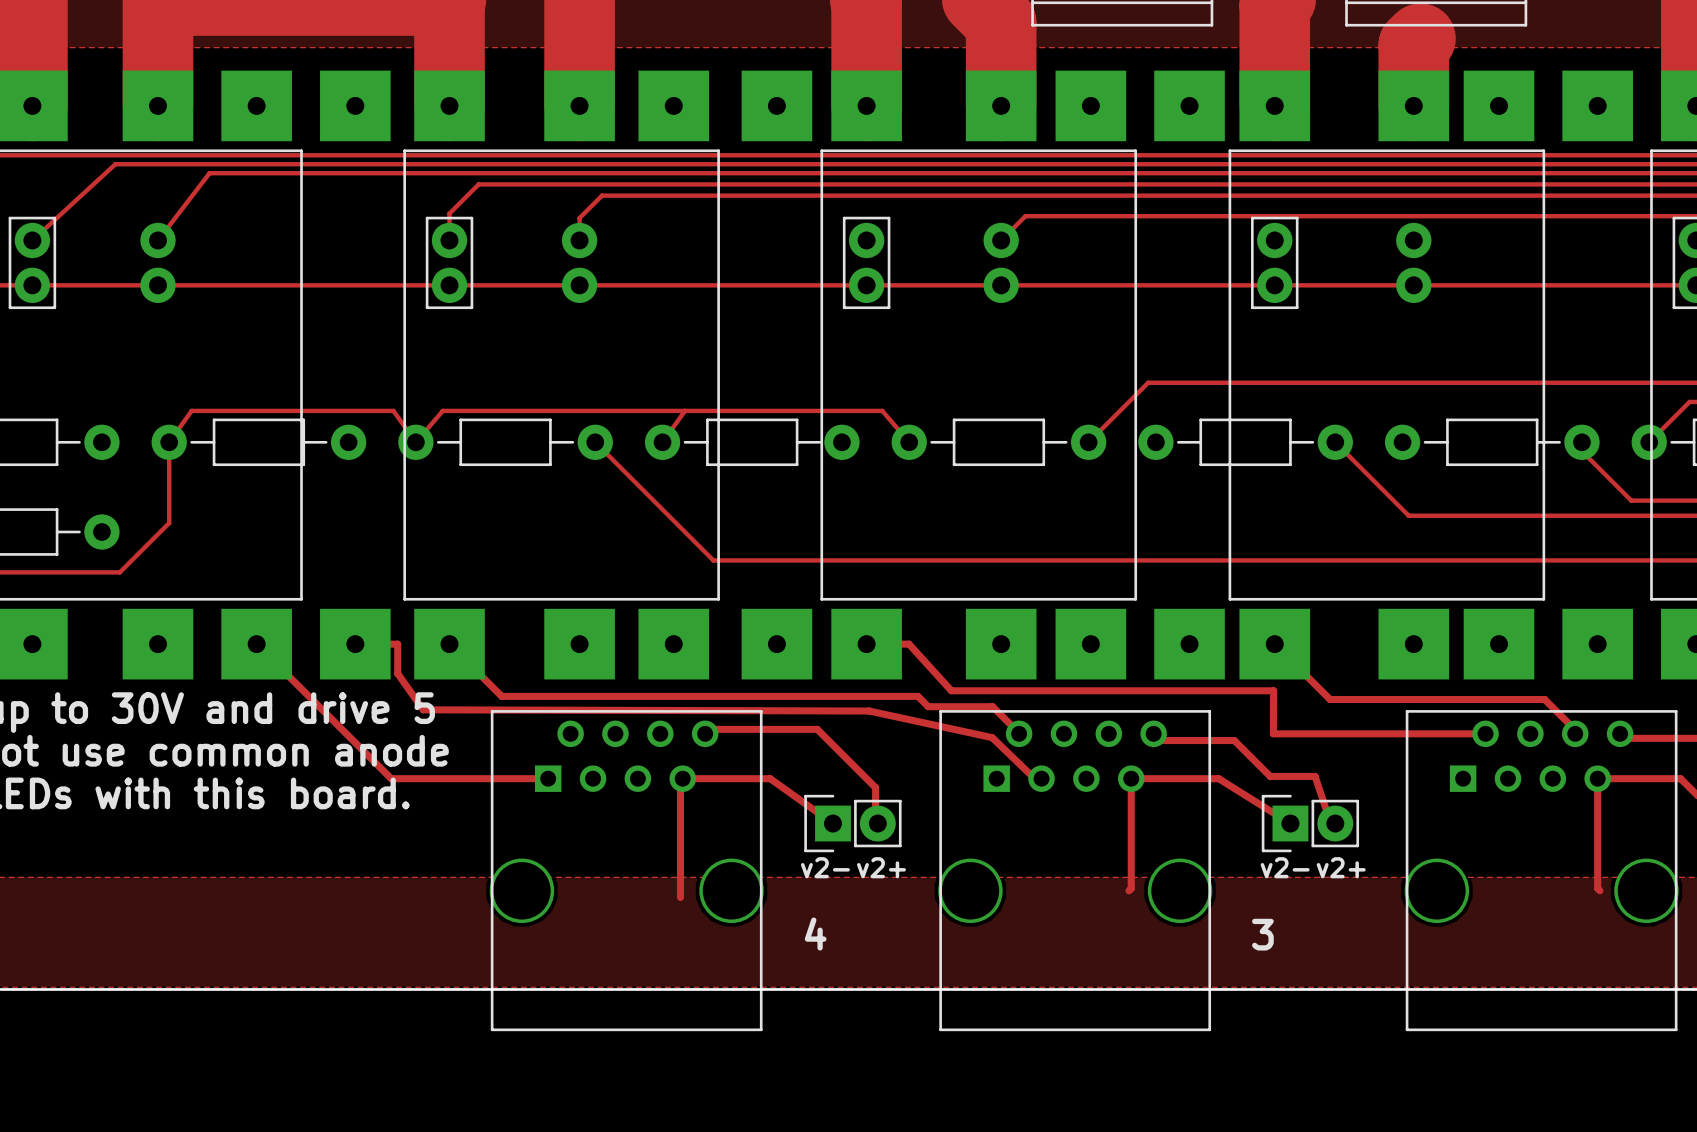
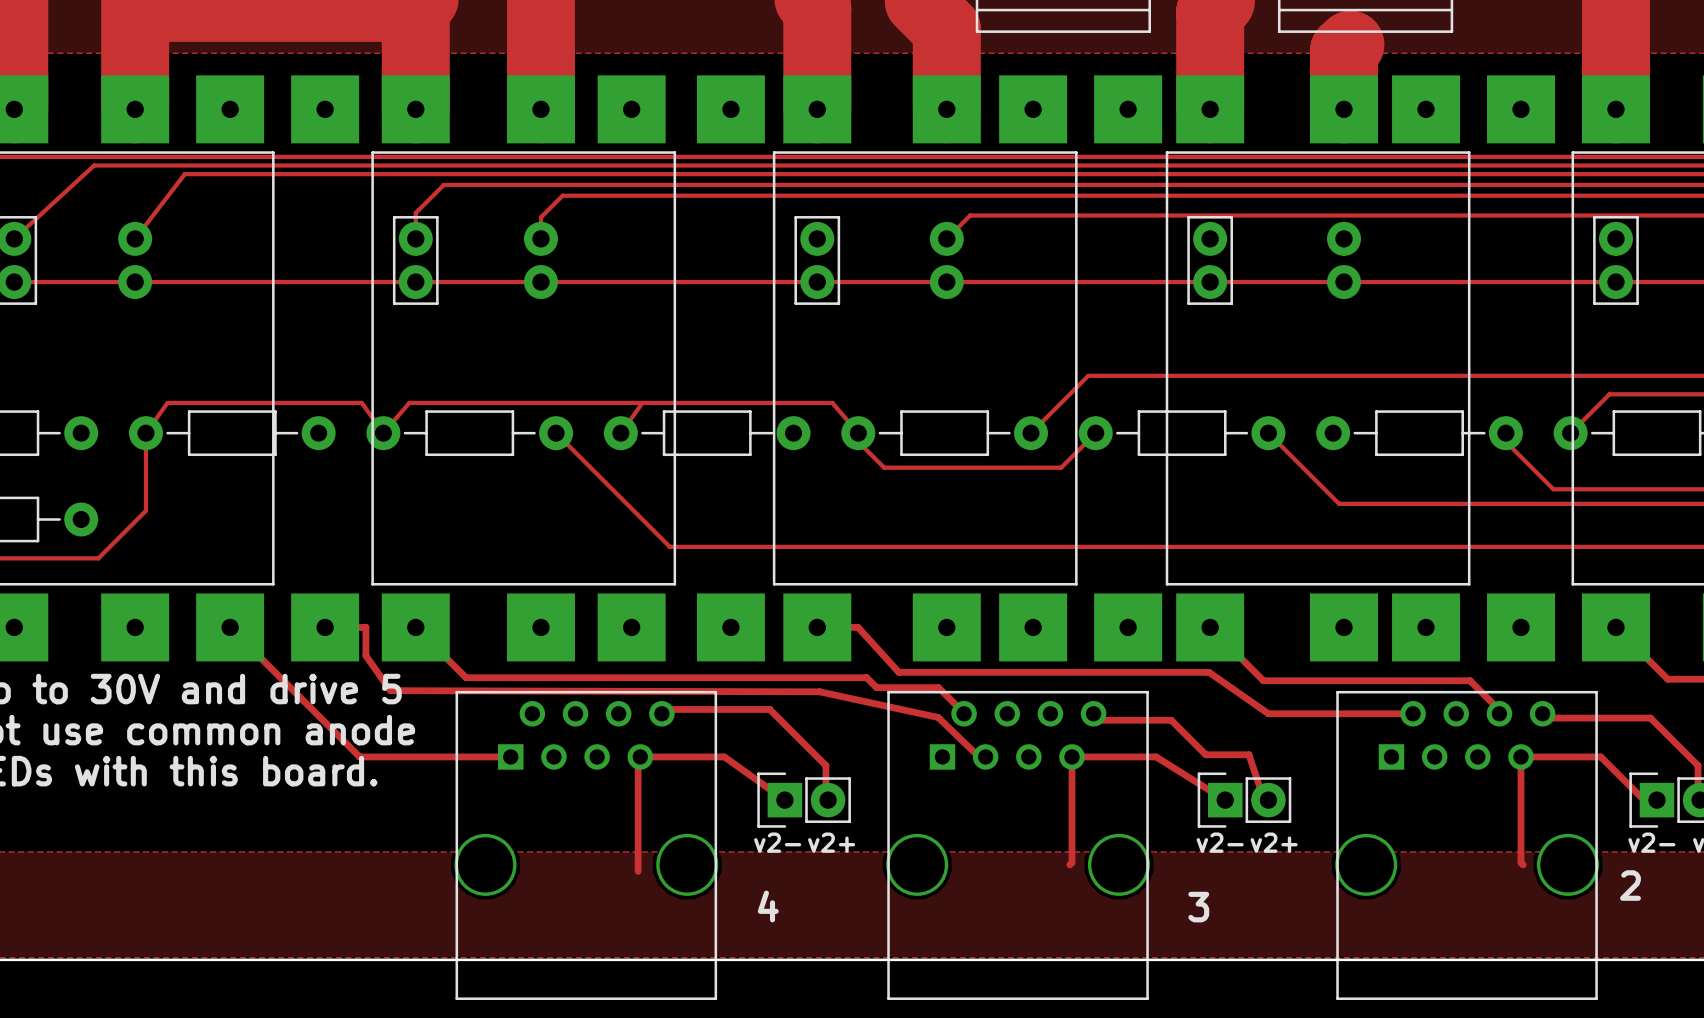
track: none -> (858, 433) (858, 441) (884, 467) (1061, 467) (1095, 433)
track: (1273, 690) (1273, 733) (1335, 733) -> (1209, 672) (1268, 713)

